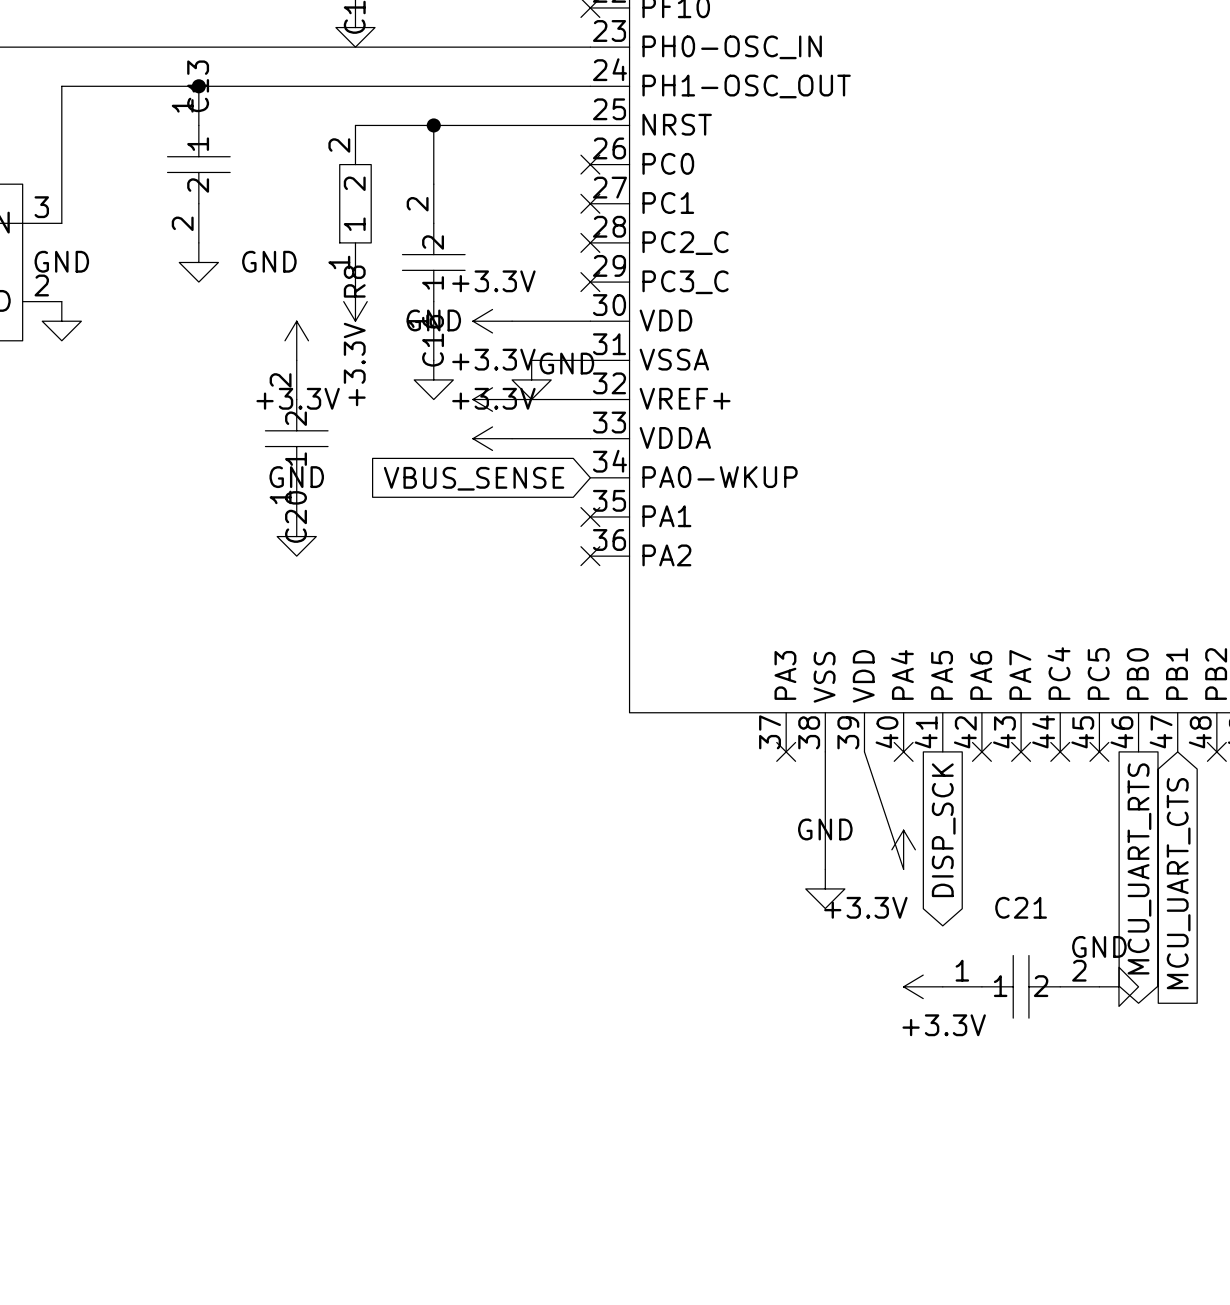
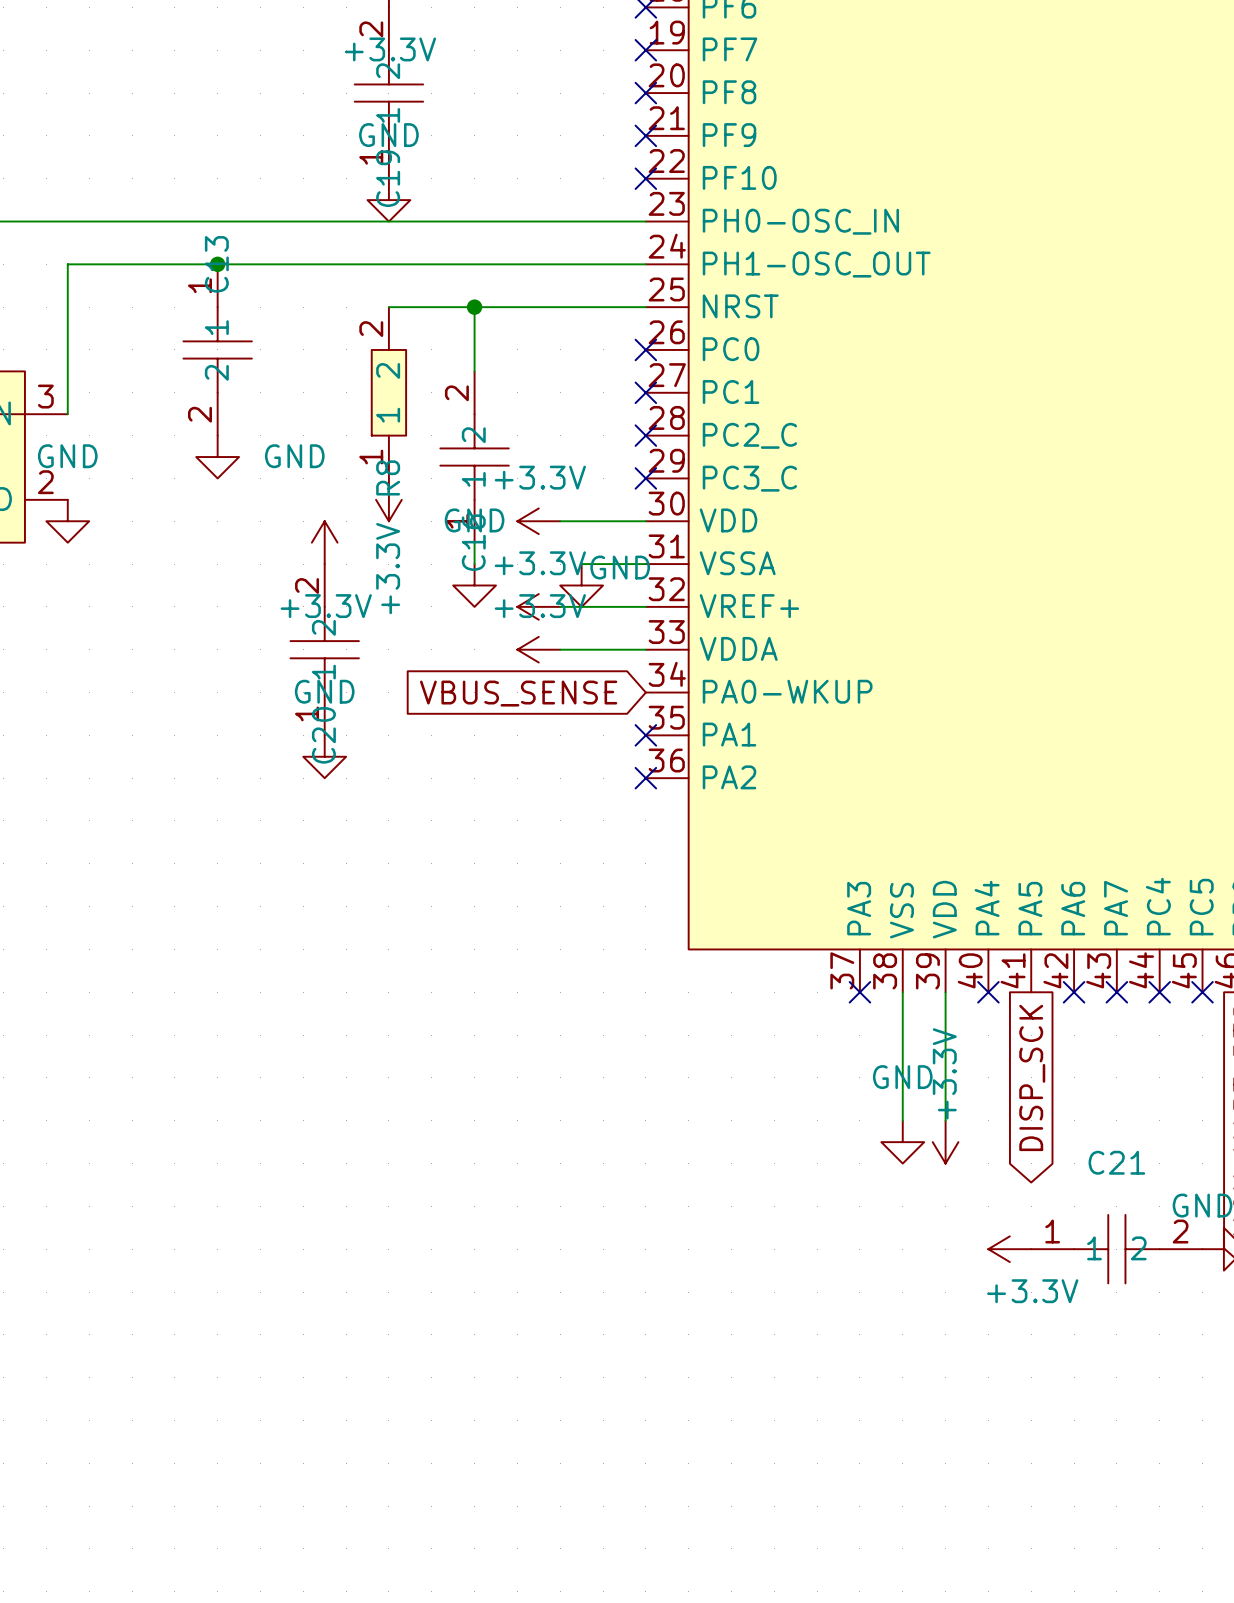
wire: (864, 751) (903, 869) -> (945, 992) (945, 1120)
power symbol rotation: 0° (903, 849) -> 180° (945, 1142)
power symbol position: +3.3V (903, 849) -> +3.3V (945, 1142)
power symbol text position: +3.3V (865, 907) -> +3.3V (944, 1073)

